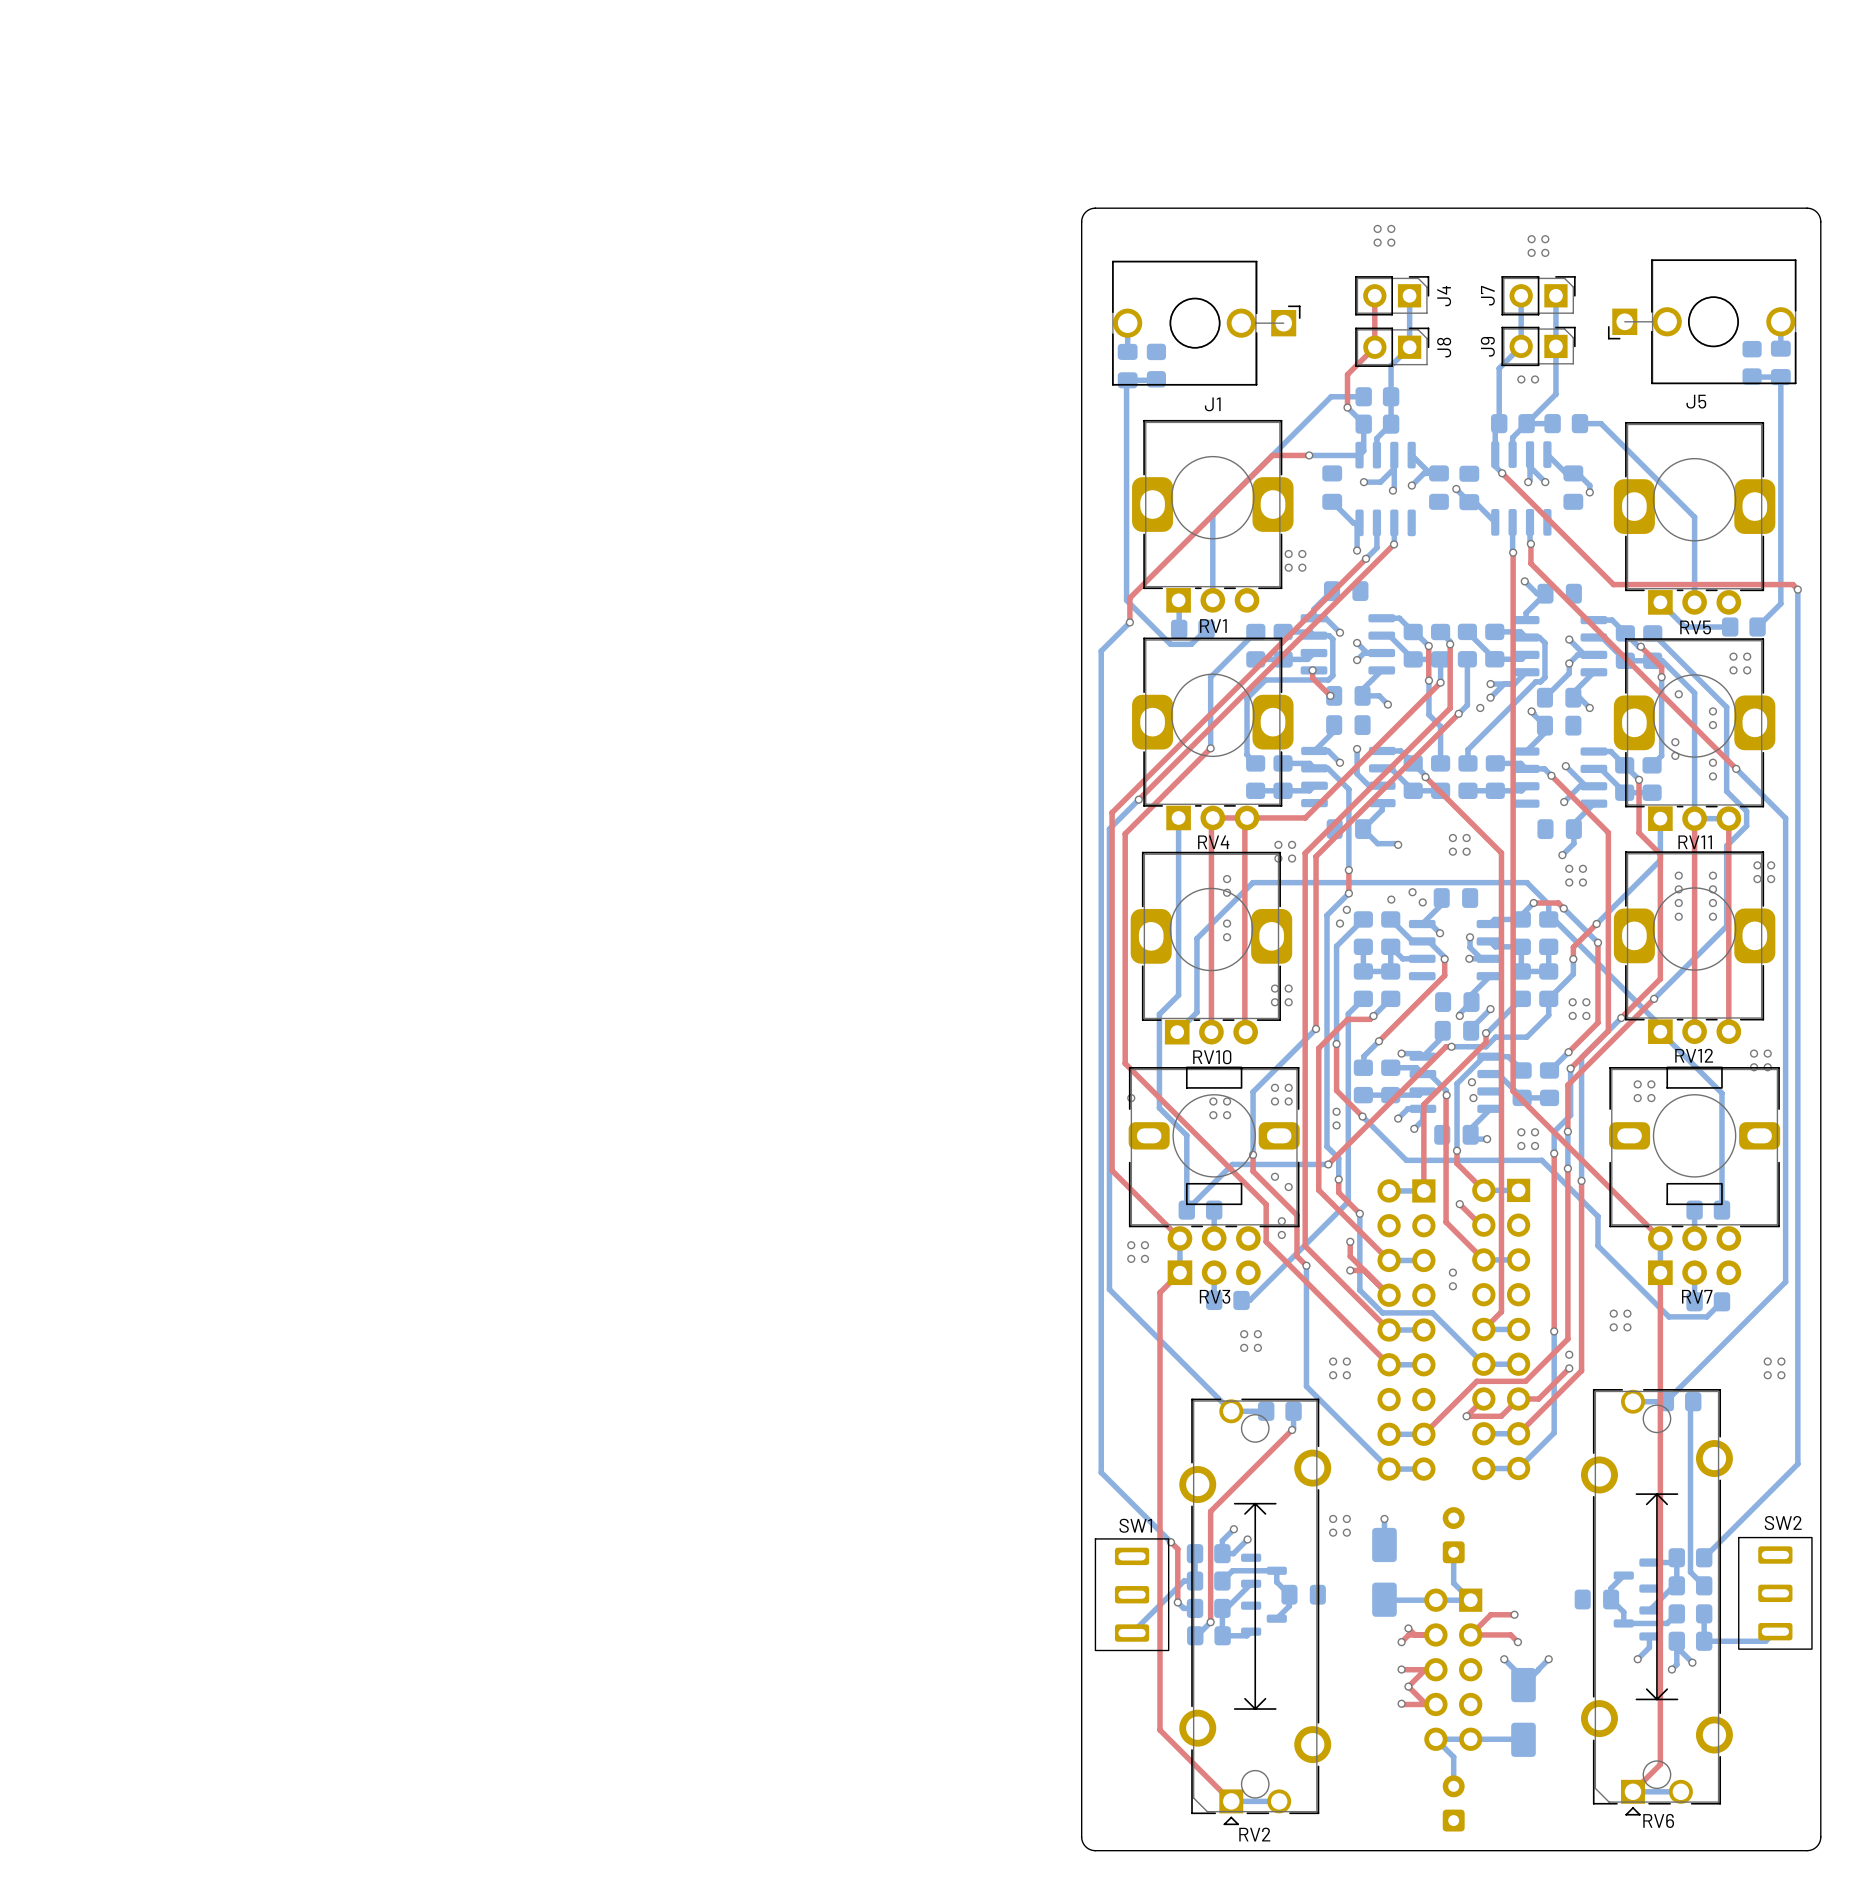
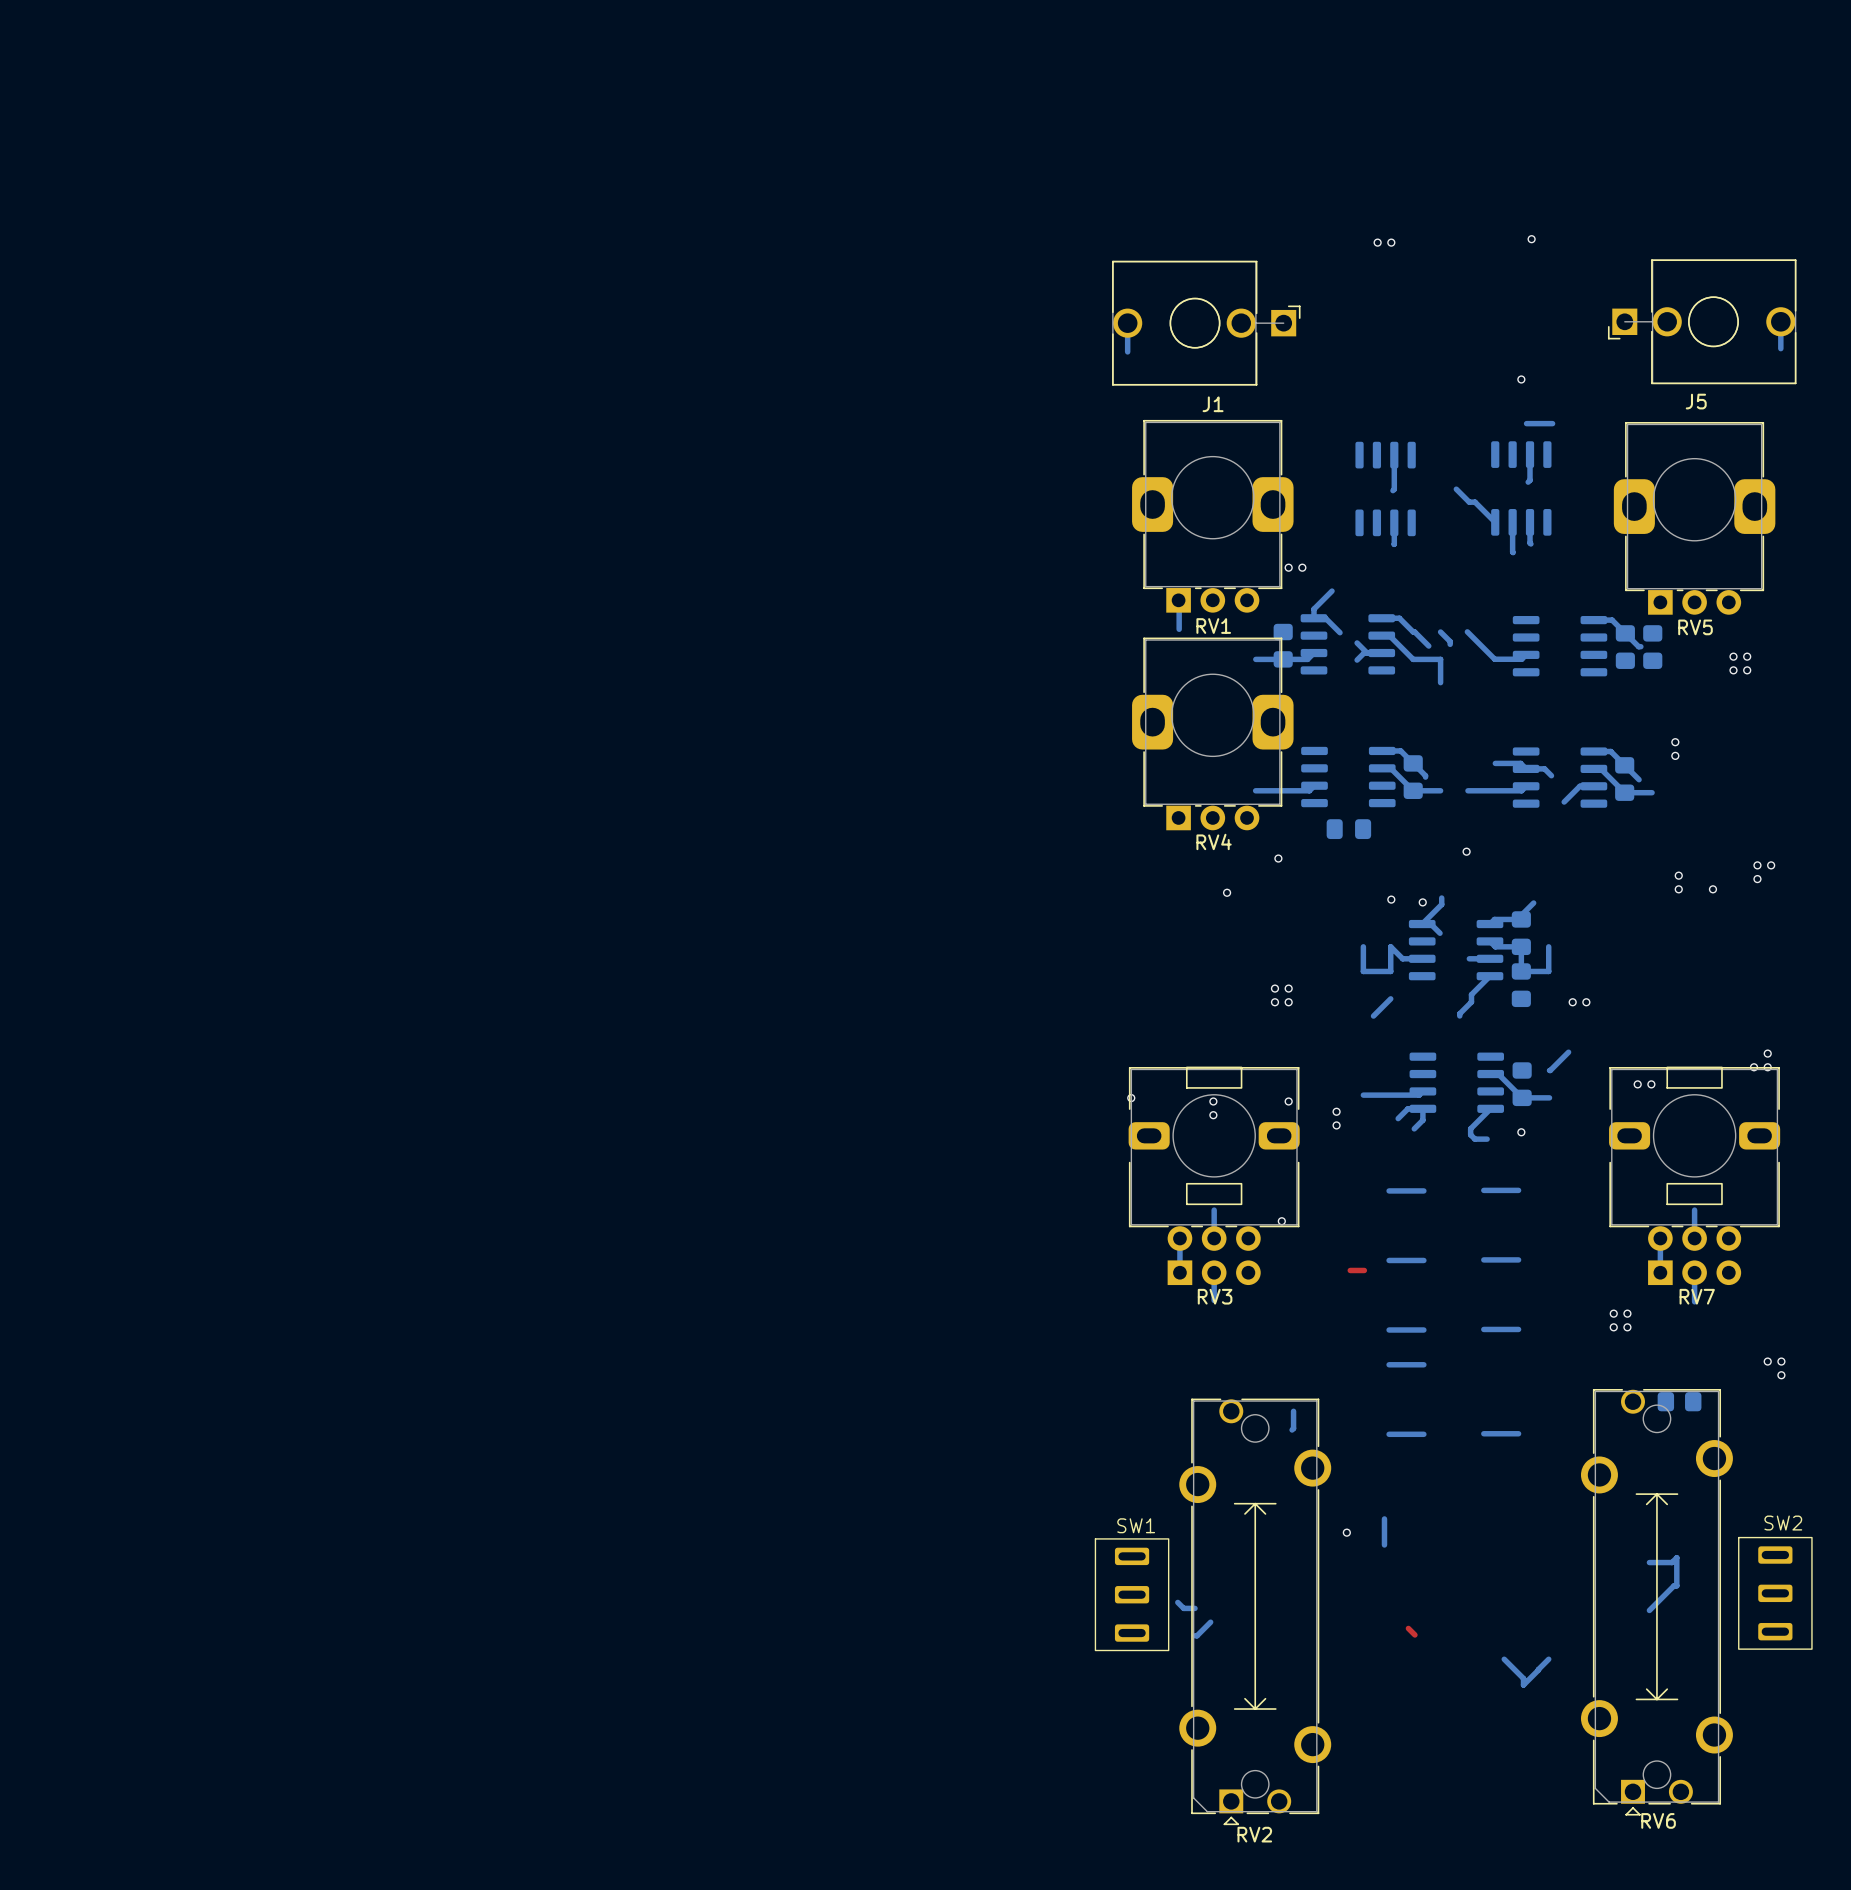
board edge: (1095, 208) (1807, 208) (1814, 210) (1819, 215) (1820, 1836) (1818, 1844) (1813, 1849) (1095, 1850) (1088, 1848) (1083, 1842) (1081, 221) (1085, 212) (1095, 208) -> none
via: (1377, 228) -> none
via: (1391, 228) -> none
via: (1545, 239) -> none
via: (1531, 252) -> none
via: (1545, 252) -> none
top track: (1374, 295) (1374, 347) -> none
J4: (1392, 295) -> none
bottom track: (1409, 295) (1409, 347) (1391, 365) (1391, 424) (1376, 438) (1376, 455) -> none
bottom track: (1521, 295) (1521, 346) (1499, 368) (1499, 423) (1495, 427) (1495, 466) (1502, 473) -> none
J7: (1538, 295) -> none
bottom track: (1555, 295) (1555, 394) (1512, 437) (1512, 454) -> none
J9: (1538, 346) -> none
top track: (1374, 347) (1347, 374) (1347, 407) -> none
J8: (1392, 347) -> none
part: (1752, 362) -> none
part: (1780, 362) -> none
part: (1156, 365) -> none
part: (1127, 366) -> none
bottom track: (1752, 376) (1780, 377) (1780, 603) (1757, 627) -> none
bottom track: (1156, 379) (1126, 381) (1126, 600) (1170, 644) (1191, 644) (1206, 629) -> none
via: (1535, 379) -> none
bottom track: (1363, 396) (1331, 396) (1212, 515) (1212, 600) -> none
part: (1377, 396) -> none
bottom track: (1347, 407) (1363, 423) (1363, 450) (1359, 455) (1309, 455) -> none
via: (1347, 407) -> none
part: (1512, 423) -> none
part: (1566, 423) -> none
bottom track: (1579, 423) (1601, 423) (1694, 517) (1694, 602) -> none
part: (1377, 424) -> none
bottom track: (1547, 454) (1566, 473) (1577, 473) (1589, 485) (1589, 492) -> none
top track: (1309, 455) (1272, 455) (1129, 598) (1129, 622) -> none
via: (1309, 455) -> none
bottom track: (1411, 455) (1429, 473) -> none
bottom track: (1530, 466) (1545, 482) -> none
bottom track: (1394, 468) (1380, 482) (1363, 482) -> none
bottom track: (1438, 473) (1424, 473) (1411, 485) -> none
top track: (1502, 473) (1613, 584) (1792, 584) (1797, 589) -> none
via: (1502, 473) -> none
via: (1363, 482) -> none
via: (1528, 482) -> none
via: (1545, 482) -> none
via: (1411, 485) -> none
part: (1332, 487) -> none
part: (1438, 487) -> none
part: (1469, 487) -> none
part: (1573, 487) -> none
via: (1456, 488) -> none
via: (1392, 490) -> none
via: (1589, 492) -> none
bottom track: (1332, 501) (1353, 522) (1359, 522) (1357, 525) (1357, 550) -> none
bottom track: (1376, 522) (1376, 547) (1366, 558) -> none
top track: (1530, 543) (1530, 563) (1736, 768) -> none
via: (1530, 543) -> none
top track: (1394, 544) (1138, 799) -> none
via: (1394, 544) -> none
via: (1357, 550) -> none
top track: (1513, 552) (1513, 1091) (1660, 1238) -> none
via: (1513, 552) -> none
via: (1288, 554) -> none
via: (1302, 554) -> none
top track: (1366, 558) (1112, 812) (1112, 1170) (1179, 1238) -> none
via: (1366, 558) -> none
bottom track: (1524, 581) (1537, 593) (1545, 593) (1526, 613) (1526, 620) -> none
via: (1524, 581) -> none
bottom track: (1797, 589) (1797, 1464) (1704, 1557) -> none
via: (1797, 589) -> none
part: (1346, 591) -> none
part: (1559, 593) -> none
bottom track: (1660, 602) (1685, 627) (1730, 627) -> none
bottom track: (1129, 622) (1101, 651) (1101, 1472) (1170, 1542) -> none
via: (1129, 622) -> none
part: (1743, 627) -> none
part: (1192, 629) -> none
bottom track: (1494, 631) (1520, 631) (1526, 637) (1539, 637) (1544, 642) (1544, 677) (1540, 681) (1535, 681) (1467, 749) (1467, 763) -> none
bottom track: (1255, 632) (1210, 677) (1210, 748) -> none
bottom track: (1283, 632) (1310, 632) (1313, 635) (1329, 635) (1332, 639) (1332, 675) (1328, 679) (1265, 679) (1247, 698) (1247, 754) (1255, 763) -> none
via: (1339, 632) -> none
bottom track: (1652, 633) (1726, 707) (1726, 791) (1746, 811) (1746, 826) (1726, 845) (1726, 926) (1654, 998) -> none
bottom track: (1593, 637) (1602, 637) (1625, 660) (1662, 660) (1694, 693) (1694, 818) (1728, 818) -> none
bottom track: (1569, 639) (1584, 654) -> none
via: (1569, 639) -> none
via: (1357, 642) -> none
top track: (1450, 644) (1450, 708) (1305, 853) (1305, 1246) (1389, 1330) -> none
via: (1450, 644) -> none
part: (1255, 645) -> none
part: (1413, 645) -> none
part: (1440, 645) -> none
part: (1467, 645) -> none
part: (1494, 645) -> none
top track: (1428, 646) (1428, 680) -> none
via: (1428, 646) -> none
top track: (1640, 646) (1661, 667) (1661, 677) -> none
via: (1640, 646) -> none
bottom track: (1593, 654) (1577, 654) (1569, 663) (1569, 673) (1544, 697) -> none
bottom track: (1467, 659) (1467, 705) (1458, 713) -> none
via: (1357, 660) -> none
via: (1569, 663) -> none
top track: (1312, 670) (1312, 678) (1330, 695) -> none
via: (1312, 670) -> none
bottom track: (1381, 670) (1362, 689) (1362, 695) (1379, 695) (1387, 704) -> none
bottom track: (1526, 672) (1514, 684) (1490, 684) -> none
bottom track: (1593, 672) (1573, 692) (1573, 697) (1579, 697) (1589, 707) -> none
bottom track: (1661, 677) (1661, 755) (1652, 765) -> none
via: (1661, 677) -> none
bottom track: (1428, 680) (1428, 714) (1440, 726) (1440, 763) -> none
via: (1428, 680) -> none
top track: (1440, 682) (1305, 817) (1211, 819) (1211, 1032) -> none
via: (1440, 682) -> none
via: (1490, 684) -> none
bottom track: (1504, 684) (1490, 697) -> none
via: (1678, 694) -> none
via: (1330, 695) -> none
part: (1348, 695) -> none
via: (1490, 697) -> none
part: (1559, 697) -> none
via: (1387, 704) -> none
via: (1480, 707) -> none
via: (1589, 707) -> none
bottom track: (1531, 711) (1544, 725) (1544, 732) (1526, 751) -> none
via: (1531, 711) -> none
via: (1712, 711) -> none
top track: (1458, 713) (1316, 856) (1316, 1028) -> none
via: (1458, 713) -> none
bottom track: (1334, 725) (1334, 731) (1314, 750) (1328, 750) (1339, 762) -> none
part: (1348, 725) -> none
part: (1559, 725) -> none
via: (1712, 725) -> none
RV11: (1694, 734) -> none
top track: (1210, 748) (1125, 833) (1125, 1063) (1266, 1204) (1266, 1241) (1389, 1364) -> none
via: (1210, 748) -> none
bottom track: (1357, 749) (1357, 773) (1368, 785) (1382, 785) -> none
via: (1357, 749) -> none
via: (1339, 762) -> none
via: (1712, 762) -> none
bottom track: (1283, 763) (1309, 763) (1314, 768) (1327, 768) (1348, 789) (1348, 870) -> none
bottom track: (1565, 766) (1585, 786) -> none
via: (1565, 766) -> none
bottom track: (1736, 768) (1785, 818) (1785, 1281) (1665, 1401) (1633, 1401) -> none
via: (1736, 768) -> none
top track: (1551, 775) (1608, 832) (1608, 1030) (1570, 1068) -> none
via: (1551, 775) -> none
via: (1712, 776) -> none
part: (1255, 777) -> none
part: (1283, 777) -> none
top track: (1425, 777) (1501, 853) (1501, 1311) (1483, 1329) -> none
via: (1425, 777) -> none
part: (1440, 777) -> none
part: (1467, 777) -> none
part: (1495, 777) -> none
top track: (1639, 779) (1639, 832) (1660, 854) (1660, 978) (1621, 1018) -> none
via: (1639, 779) -> none
part: (1652, 779) -> none
bottom track: (1138, 799) (1109, 829) (1109, 1289) (1231, 1411) (1266, 1411) -> none
via: (1138, 799) -> none
via: (1564, 802) -> none
bottom track: (1382, 803) (1382, 809) (1363, 829) (1377, 843) (1398, 844) -> none
bottom track: (1593, 803) (1573, 823) (1573, 843) (1562, 855) -> none
bottom track: (1178, 817) (1178, 995) (1159, 1014) (1159, 1108) (1186, 1135) (1186, 1210) (1232, 1164) (1328, 1164) -> none
top track: (1247, 817) (1244, 820) (1245, 1032) -> none
bottom track: (1660, 818) (1660, 860) (1596, 923) -> none
top track: (1694, 818) (1694, 1031) -> none
top track: (1728, 818) (1728, 1031) -> none
part: (1559, 829) -> none
via: (1452, 838) -> none
via: (1466, 838) -> none
via: (1278, 844) -> none
via: (1292, 844) -> none
via: (1398, 844) -> none
via: (1452, 851) -> none
via: (1562, 855) -> none
via: (1292, 858) -> none
via: (1569, 868) -> none
via: (1582, 868) -> none
top track: (1348, 870) (1348, 893) -> none
via: (1348, 870) -> none
via: (1712, 875) -> none
via: (1227, 879) -> none
via: (1771, 879) -> none
via: (1569, 882) -> none
via: (1582, 882) -> none
via: (1412, 892) -> none
bottom track: (1348, 893) (1326, 915) (1326, 1146) (1338, 1158) (1338, 1179) -> none
via: (1348, 893) -> none
part: (1455, 898) -> none
top track: (1533, 903) (1558, 903) (1563, 908) -> none
via: (1533, 903) -> none
via: (1678, 903) -> none
via: (1712, 903) -> none
bottom track: (1563, 908) (1598, 942) -> none
via: (1563, 908) -> none
via: (1346, 909) -> none
via: (1678, 916) -> none
via: (1712, 916) -> none
bottom track: (1363, 919) (1336, 946) (1336, 1044) -> none
bottom track: (1390, 919) (1412, 941) (1428, 941) (1444, 959) -> none
via: (1227, 923) -> none
via: (1339, 923) -> none
top track: (1596, 923) (1573, 947) (1573, 959) -> none
via: (1596, 923) -> none
part: (1363, 933) -> none
part: (1390, 933) -> none
via: (1440, 933) -> none
part: (1548, 933) -> none
via: (1227, 937) -> none
bottom track: (1470, 937) (1470, 947) (1481, 958) -> none
via: (1470, 937) -> none
top track: (1598, 942) (1598, 1022) (1568, 1052) -> none
via: (1598, 942) -> none
RV12: (1694, 947) -> none
RV10: (1211, 948) -> none
via: (1469, 958) -> none
top track: (1444, 959) (1444, 975) (1379, 1041) -> none
via: (1444, 959) -> none
bottom track: (1573, 959) (1573, 974) (1548, 998) (1548, 1015) (1526, 1037) (1495, 1037) (1486, 1046) (1451, 1046) -> none
via: (1573, 959) -> none
part: (1363, 985) -> none
part: (1390, 985) -> none
part: (1548, 985) -> none
bottom track: (1363, 998) (1348, 1013) (1348, 1201) (1249, 1300) (1241, 1300) -> none
bottom track: (1521, 998) (1486, 1033) -> none
top track: (1654, 998) (1567, 1085) (1567, 1131) -> none
via: (1654, 998) -> none
part: (1457, 1002) -> none
bottom track: (1490, 1009) (1471, 1028) (1471, 1030) -> none
via: (1490, 1009) -> none
via: (1459, 1015) -> none
via: (1572, 1015) -> none
via: (1586, 1015) -> none
top track: (1373, 1016) (1370, 1019) (1347, 1019) (1318, 1048) (1318, 1190) (1389, 1260) -> none
via: (1373, 1016) -> none
bottom track: (1621, 1018) (1581, 1057) (1581, 1180) -> none
via: (1621, 1018) -> none
bottom track: (1660, 1022) (1660, 1031) (1721, 1093) (1721, 1210) -> none
bottom track: (1660, 1025) (1554, 919) (1548, 919) (1548, 904) (1526, 882) (1252, 882) (1196, 938) (1196, 1012) (1177, 1032) -> none
bottom track: (1316, 1028) (1253, 1091) (1253, 1154) -> none
via: (1316, 1028) -> none
bottom track: (1442, 1030) (1442, 1036) (1422, 1056) (1419, 1053) (1401, 1053) -> none
part: (1456, 1030) -> none
top track: (1486, 1033) (1486, 1042) (1423, 1104) (1423, 1190) -> none
via: (1486, 1033) -> none
bottom track: (1379, 1041) (1363, 1056) (1363, 1067) -> none
via: (1379, 1041) -> none
top track: (1336, 1044) (1336, 1090) (1362, 1116) -> none
via: (1336, 1044) -> none
top track: (1451, 1046) (1446, 1046) (1328, 1164) -> none
via: (1451, 1046) -> none
via: (1568, 1052) -> none
via: (1401, 1053) -> none
via: (1754, 1053) -> none
bottom track: (1390, 1067) (1416, 1067) (1422, 1074) (1429, 1074) (1446, 1090) (1446, 1095) -> none
bottom track: (1570, 1068) (1570, 1115) (1554, 1131) (1554, 1153) -> none
via: (1570, 1068) -> none
bottom track: (1522, 1070) (1508, 1056) (1483, 1056) (1457, 1083) (1457, 1150) -> none
part: (1363, 1081) -> none
part: (1390, 1081) -> none
via: (1471, 1082) -> none
part: (1549, 1084) -> none
via: (1274, 1087) -> none
via: (1288, 1087) -> none
top track: (1446, 1095) (1446, 1222) (1483, 1259) -> none
via: (1446, 1095) -> none
via: (1473, 1098) -> none
via: (1637, 1098) -> none
via: (1651, 1098) -> none
via: (1227, 1101) -> none
via: (1274, 1101) -> none
via: (1227, 1115) -> none
bottom track: (1362, 1116) (1406, 1160) (1541, 1160) (1598, 1216) (1598, 1245) (1668, 1316) (1706, 1316) (1721, 1301) -> none
via: (1362, 1116) -> none
via: (1398, 1118) -> none
via: (1414, 1128) -> none
bottom track: (1567, 1131) (1567, 1168) -> none
via: (1567, 1131) -> none
via: (1535, 1132) -> none
part: (1456, 1134) -> none
via: (1487, 1139) -> none
via: (1521, 1145) -> none
via: (1535, 1145) -> none
top track: (1457, 1150) (1457, 1163) (1483, 1190) -> none
via: (1457, 1150) -> none
top track: (1554, 1153) (1554, 1331) -> none
via: (1554, 1153) -> none
top track: (1253, 1154) (1253, 1171) (1296, 1215) (1296, 1256) (1306, 1265) -> none
via: (1253, 1154) -> none
via: (1328, 1164) -> none
top track: (1567, 1168) (1567, 1339) (1525, 1381) (1476, 1381) (1423, 1434) -> none
via: (1567, 1168) -> none
via: (1274, 1176) -> none
top track: (1338, 1179) (1338, 1192) (1359, 1213) -> none
via: (1338, 1179) -> none
top track: (1581, 1180) (1581, 1370) (1518, 1433) -> none
via: (1581, 1180) -> none
via: (1288, 1187) -> none
top track: (1459, 1204) (1480, 1225) (1483, 1225) -> none
via: (1459, 1204) -> none
part: (1200, 1210) -> none
part: (1708, 1210) -> none
bottom track: (1359, 1213) (1359, 1290) (1382, 1312) (1432, 1312) (1483, 1364) (1518, 1364) -> none
via: (1359, 1213) -> none
via: (1281, 1234) -> none
top track: (1350, 1241) (1350, 1256) (1389, 1295) -> none
via: (1350, 1241) -> none
via: (1131, 1245) -> none
via: (1144, 1245) -> none
via: (1131, 1258) -> none
via: (1144, 1258) -> none
bottom track: (1306, 1265) (1306, 1386) (1389, 1469) (1423, 1469) -> none
via: (1306, 1265) -> none
via: (1350, 1270) -> none
top track: (1179, 1272) (1160, 1292) (1160, 1730) (1231, 1801) -> none
via: (1452, 1272) -> none
top track: (1660, 1272) (1660, 1764) (1633, 1791) -> none
via: (1452, 1286) -> none
part: (1227, 1300) -> none
part: (1708, 1301) -> none
part: (1501, 1329) -> none
part: (1406, 1330) -> none
bottom track: (1554, 1331) (1554, 1432) (1518, 1468) (1483, 1468) -> none
via: (1554, 1331) -> none
via: (1244, 1334) -> none
via: (1257, 1334) -> none
via: (1244, 1347) -> none
via: (1257, 1347) -> none
via: (1569, 1354) -> none
via: (1333, 1361) -> none
via: (1346, 1361) -> none
top track: (1569, 1368) (1538, 1398) (1518, 1398) (1501, 1416) (1466, 1416) (1483, 1399) -> none
via: (1569, 1368) -> none
via: (1333, 1375) -> none
via: (1346, 1375) -> none
via: (1767, 1375) -> none
bottom track: (1693, 1401) (1690, 1404) (1690, 1572) (1704, 1585) -> none
part: (1279, 1411) -> none
via: (1466, 1416) -> none
top track: (1292, 1429) (1210, 1511) (1210, 1622) -> none
via: (1292, 1429) -> none
via: (1333, 1518) -> none
via: (1346, 1518) -> none
via: (1384, 1518) -> none
bottom track: (1233, 1529) (1222, 1540) (1222, 1553) (1233, 1553) (1247, 1539) -> none
via: (1233, 1529) -> none
via: (1333, 1532) -> none
part: (1453, 1535) -> none
via: (1247, 1539) -> none
top track: (1170, 1542) (1177, 1549) (1177, 1602) -> none
via: (1170, 1542) -> none
bottom track: (1453, 1552) (1453, 1583) (1470, 1600) (1384, 1599) -> none
bottom track: (1195, 1553) (1195, 1581) (1184, 1581) (1132, 1633) -> none
part: (1208, 1553) -> none
part: (1690, 1557) -> none
part: (1263, 1570) -> none
part: (1384, 1572) -> none
bottom track: (1623, 1575) (1611, 1588) (1611, 1599) (1623, 1612) (1623, 1623) (1667, 1623) (1676, 1613) -> none
part: (1636, 1575) -> none
part: (1208, 1581) -> none
bottom track: (1222, 1581) (1232, 1570) (1276, 1570) (1276, 1582) (1289, 1594) (1289, 1606) (1276, 1618) -> none
bottom track: (1251, 1583) (1226, 1608) (1222, 1608) (1222, 1635) (1247, 1635) (1251, 1631) -> none
part: (1690, 1585) -> none
part: (1303, 1594) -> none
part: (1596, 1599) -> none
via: (1177, 1602) -> none
part: (1208, 1608) -> none
part: (1690, 1613) -> none
bottom track: (1704, 1613) (1704, 1641) (1765, 1641) (1775, 1631) -> none
top track: (1514, 1614) (1490, 1614) (1470, 1634) (1510, 1634) (1517, 1642) -> none
via: (1514, 1614) -> none
part: (1263, 1618) -> none
via: (1210, 1622) -> none
part: (1636, 1623) -> none
via: (1408, 1628) -> none
top track: (1435, 1634) (1408, 1634) (1401, 1642) -> none
part: (1208, 1635) -> none
bottom track: (1649, 1636) (1649, 1647) (1637, 1659) -> none
bottom track: (1676, 1641) (1676, 1664) (1671, 1669) -> none
part: (1690, 1641) -> none
via: (1401, 1642) -> none
via: (1517, 1642) -> none
bottom track: (1676, 1647) (1692, 1662) -> none
via: (1504, 1659) -> none
via: (1548, 1659) -> none
via: (1637, 1659) -> none
via: (1692, 1662) -> none
top track: (1401, 1669) (1435, 1669) -> none
via: (1401, 1669) -> none
top track: (1425, 1669) (1408, 1686) (1426, 1704) -> none
part: (1453, 1669) -> none
via: (1671, 1669) -> none
via: (1408, 1686) -> none
top track: (1401, 1703) (1435, 1704) -> none
via: (1401, 1703) -> none
part: (1523, 1712) -> none
bottom track: (1523, 1739) (1435, 1739) (1453, 1757) (1453, 1786) -> none
bottom track: (1633, 1791) (1680, 1791) -> none
bottom track: (1231, 1801) (1279, 1801) -> none
part: (1453, 1803) -> none

